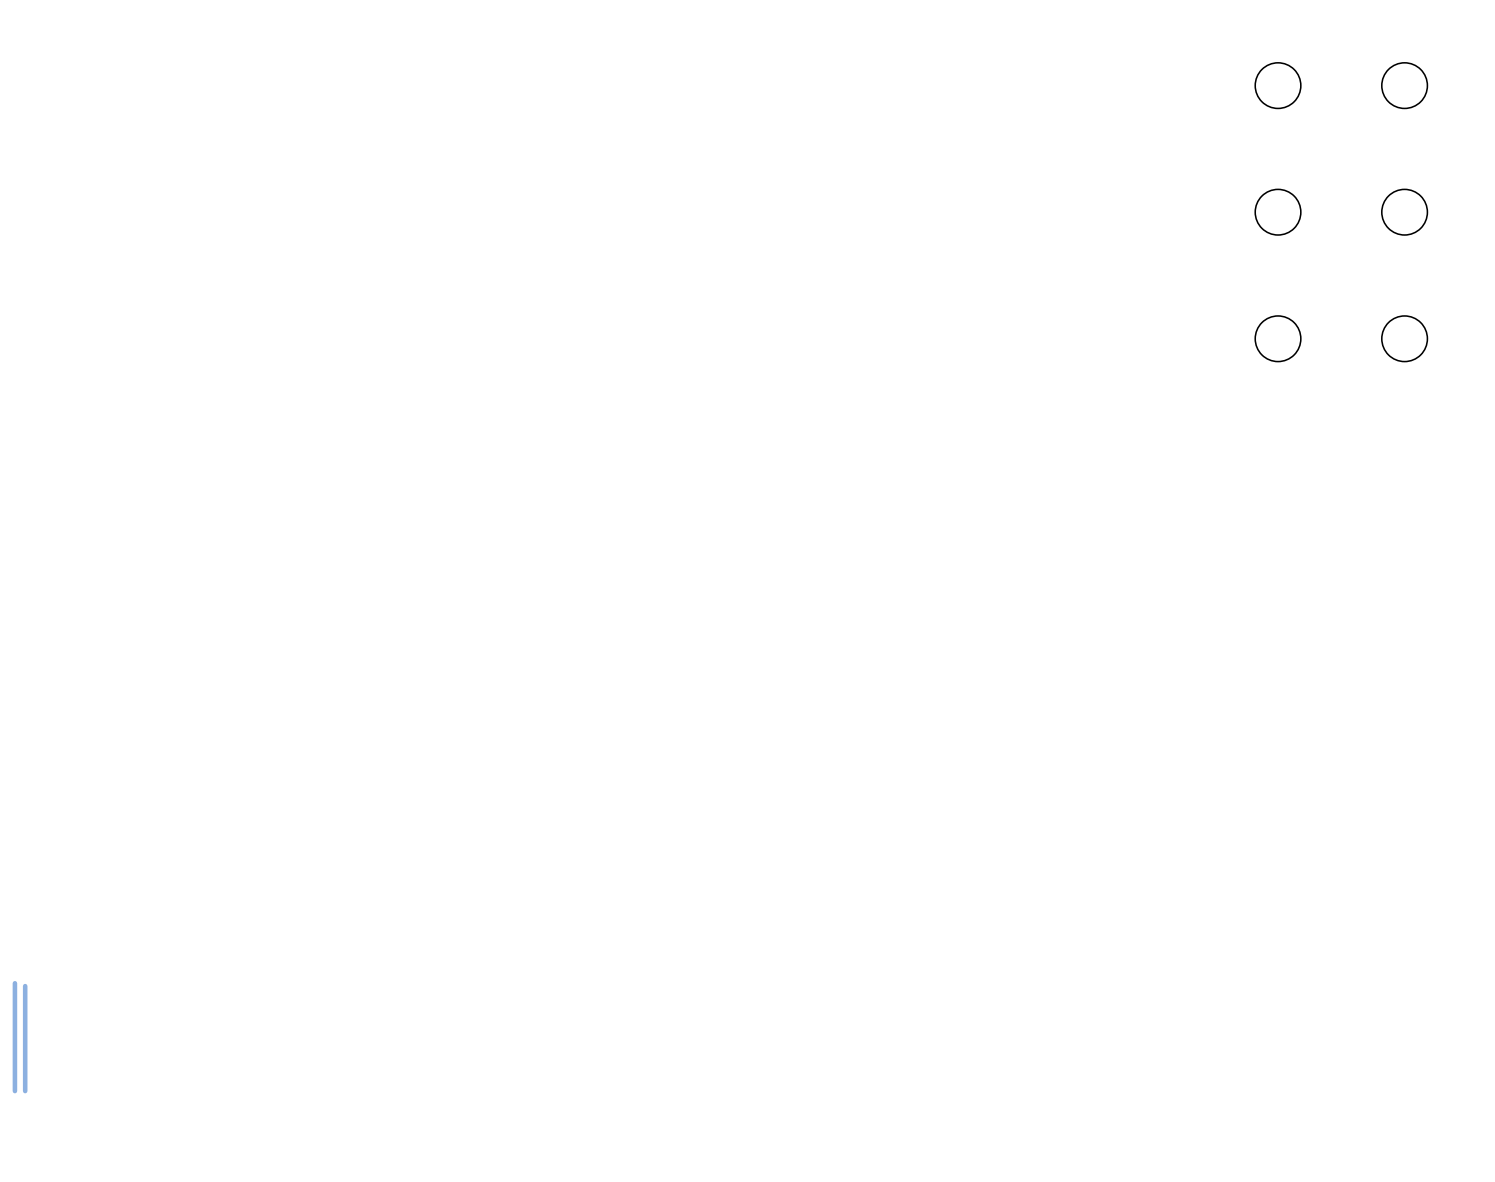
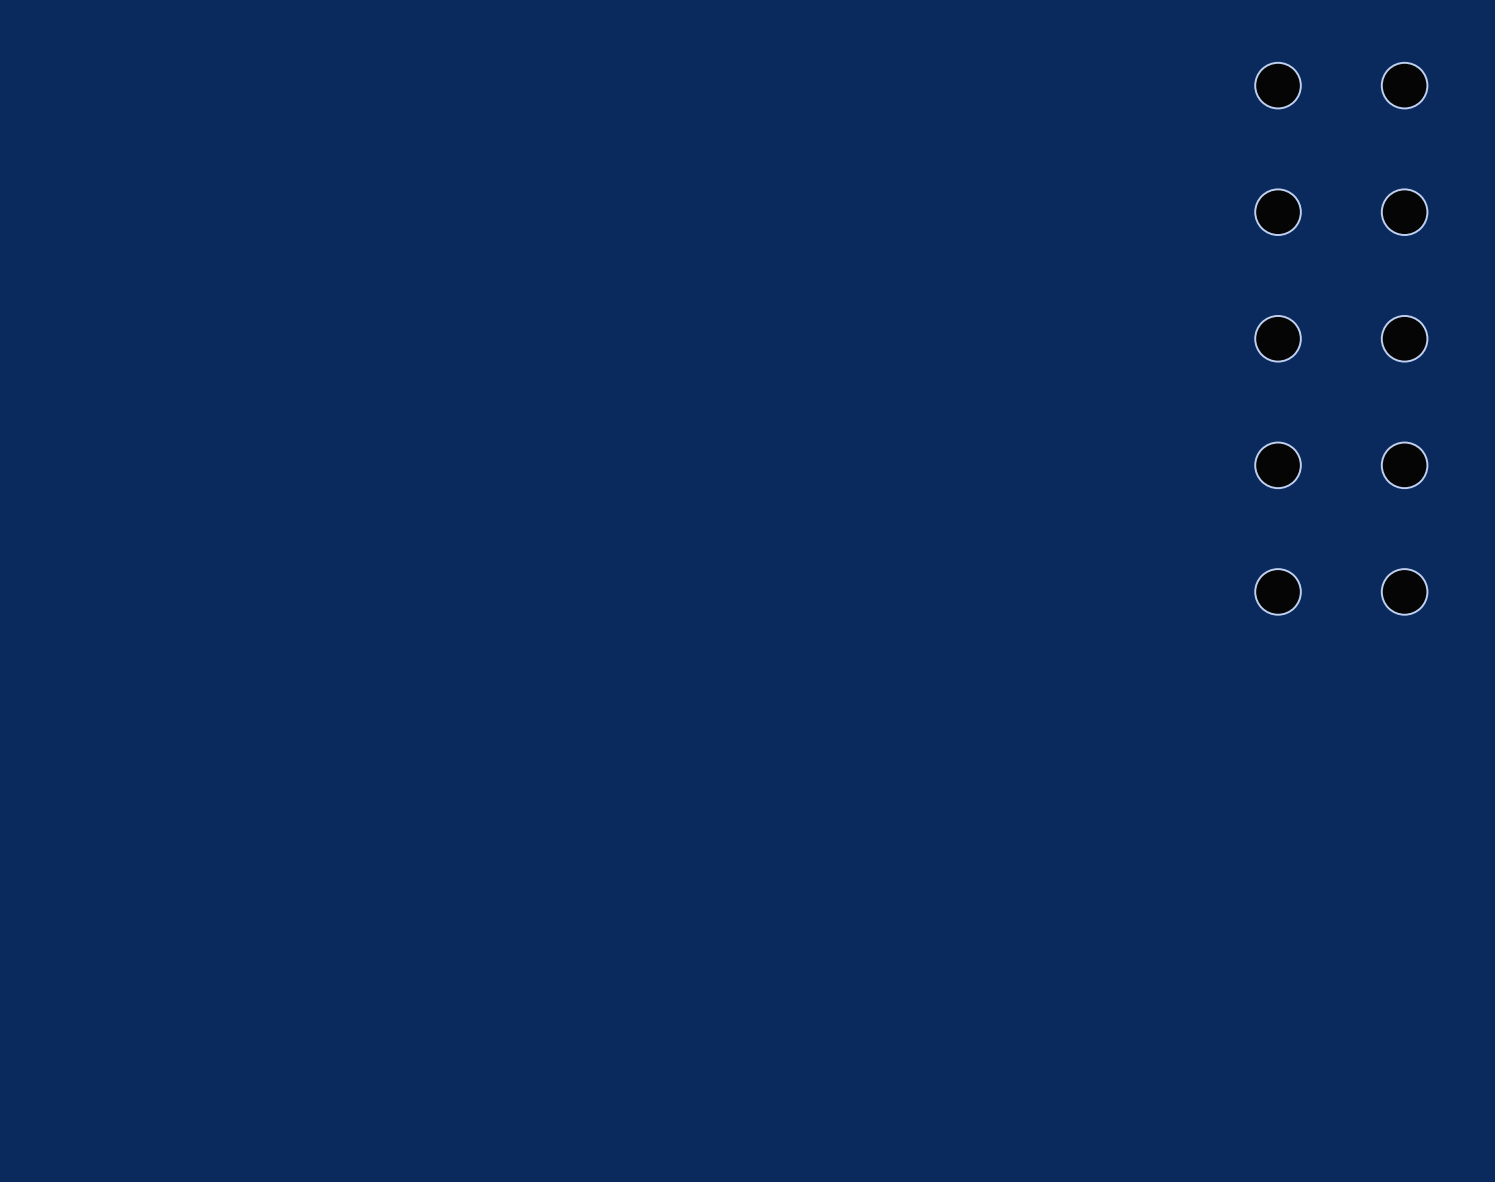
part: none -> (1278, 465)
part: none -> (1404, 465)
part: none -> (1278, 591)
part: none -> (1404, 591)
track: (14, 983) (14, 1091) -> none
track: (25, 986) (25, 1091) -> none

